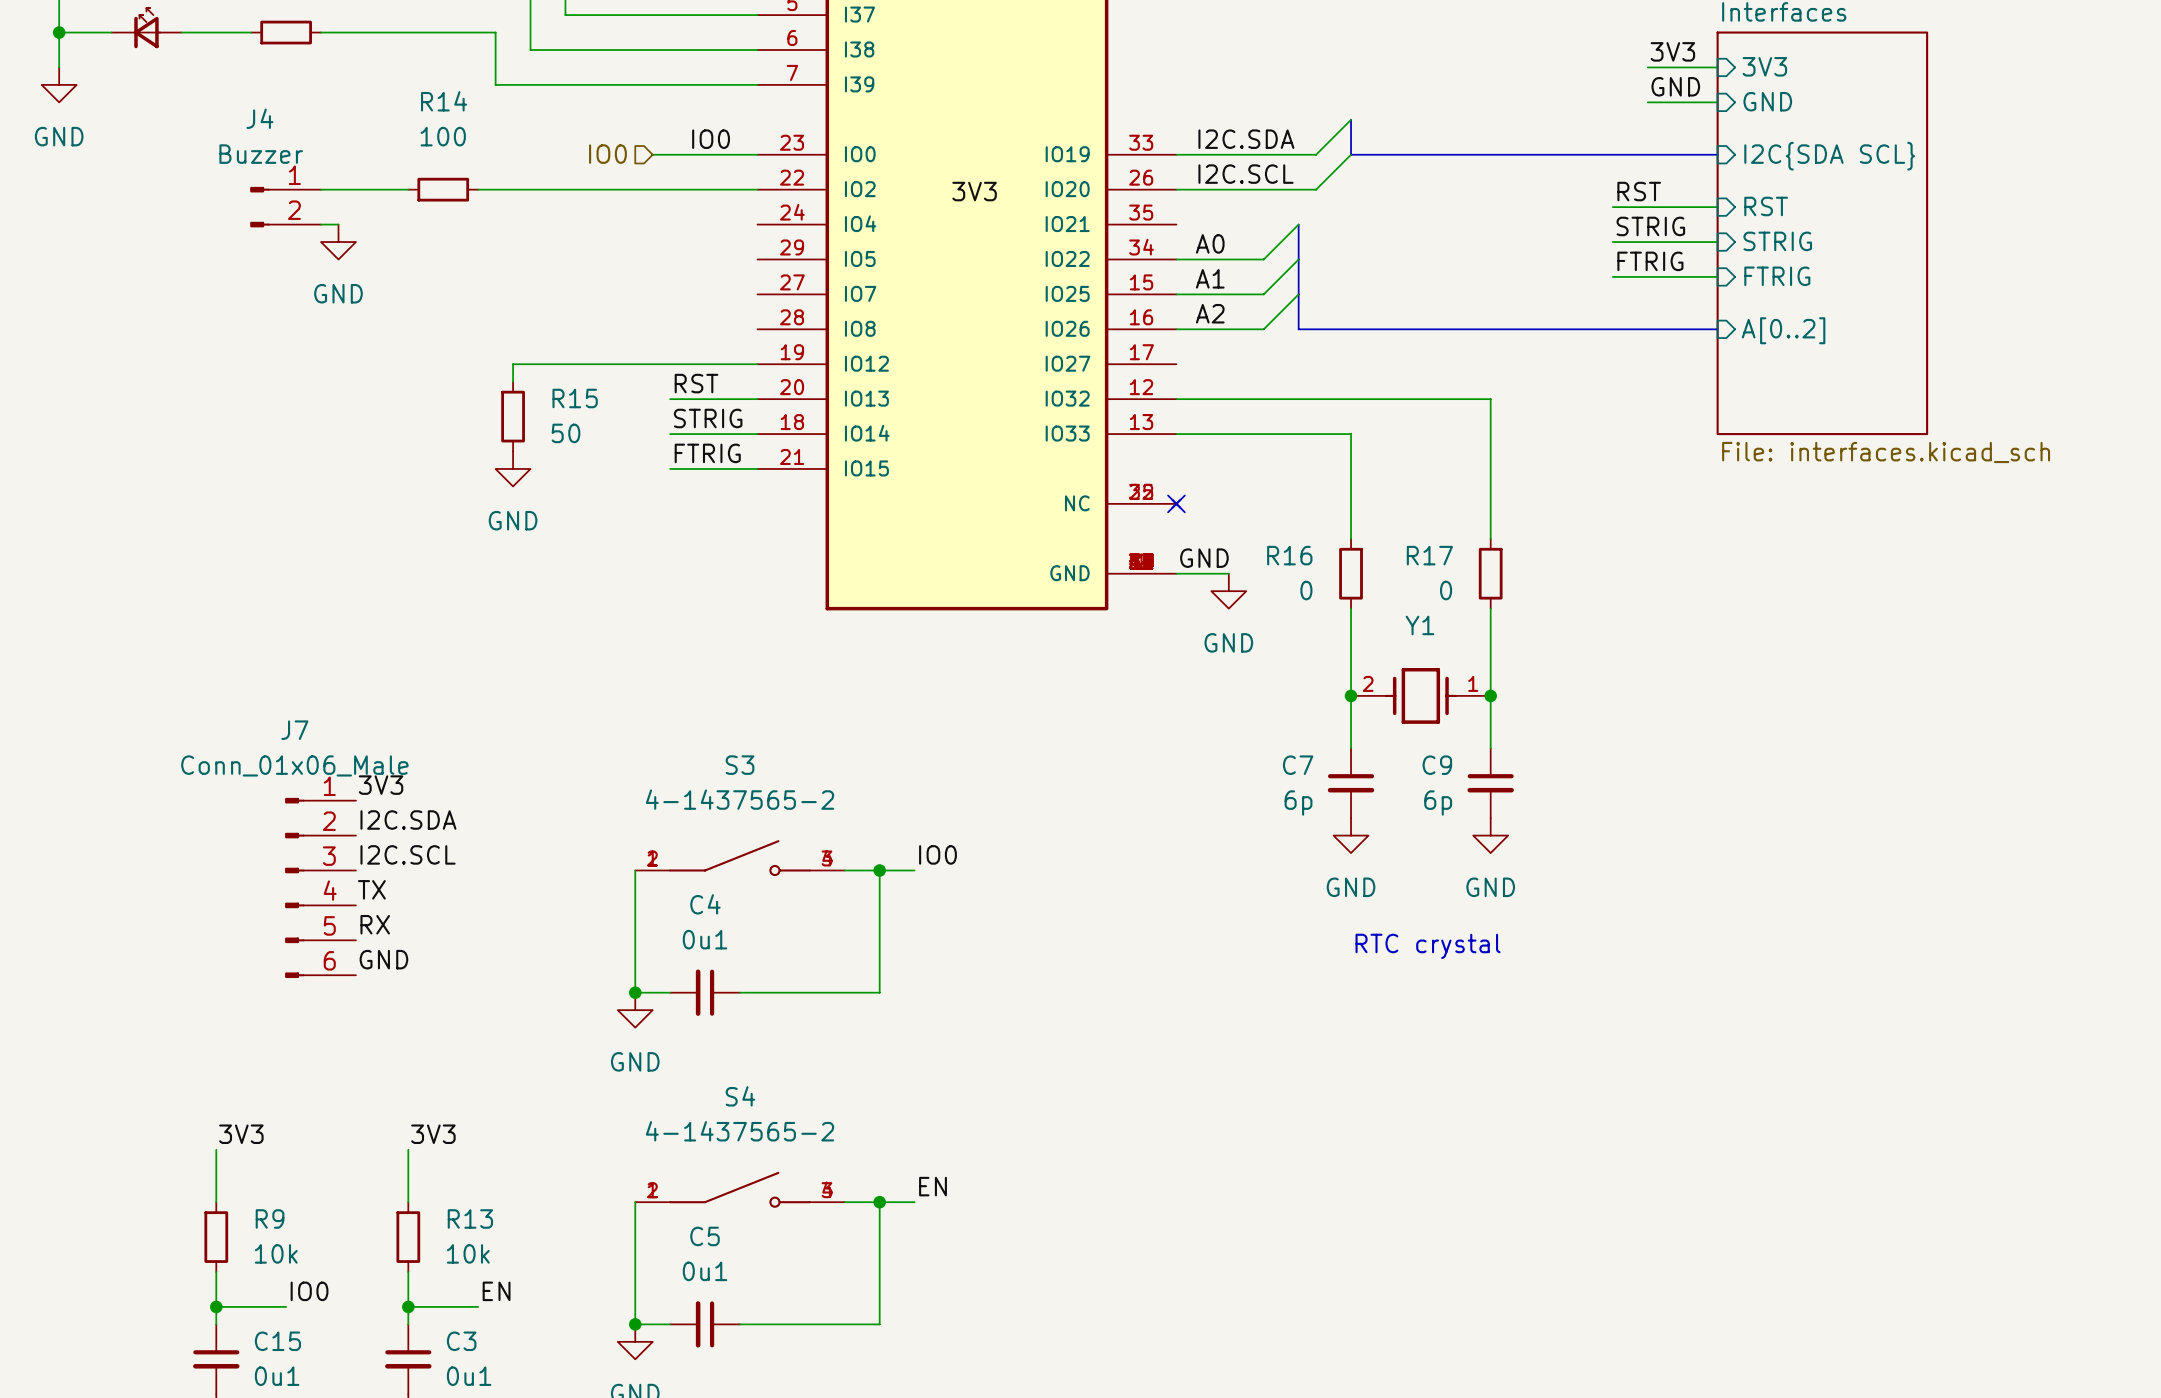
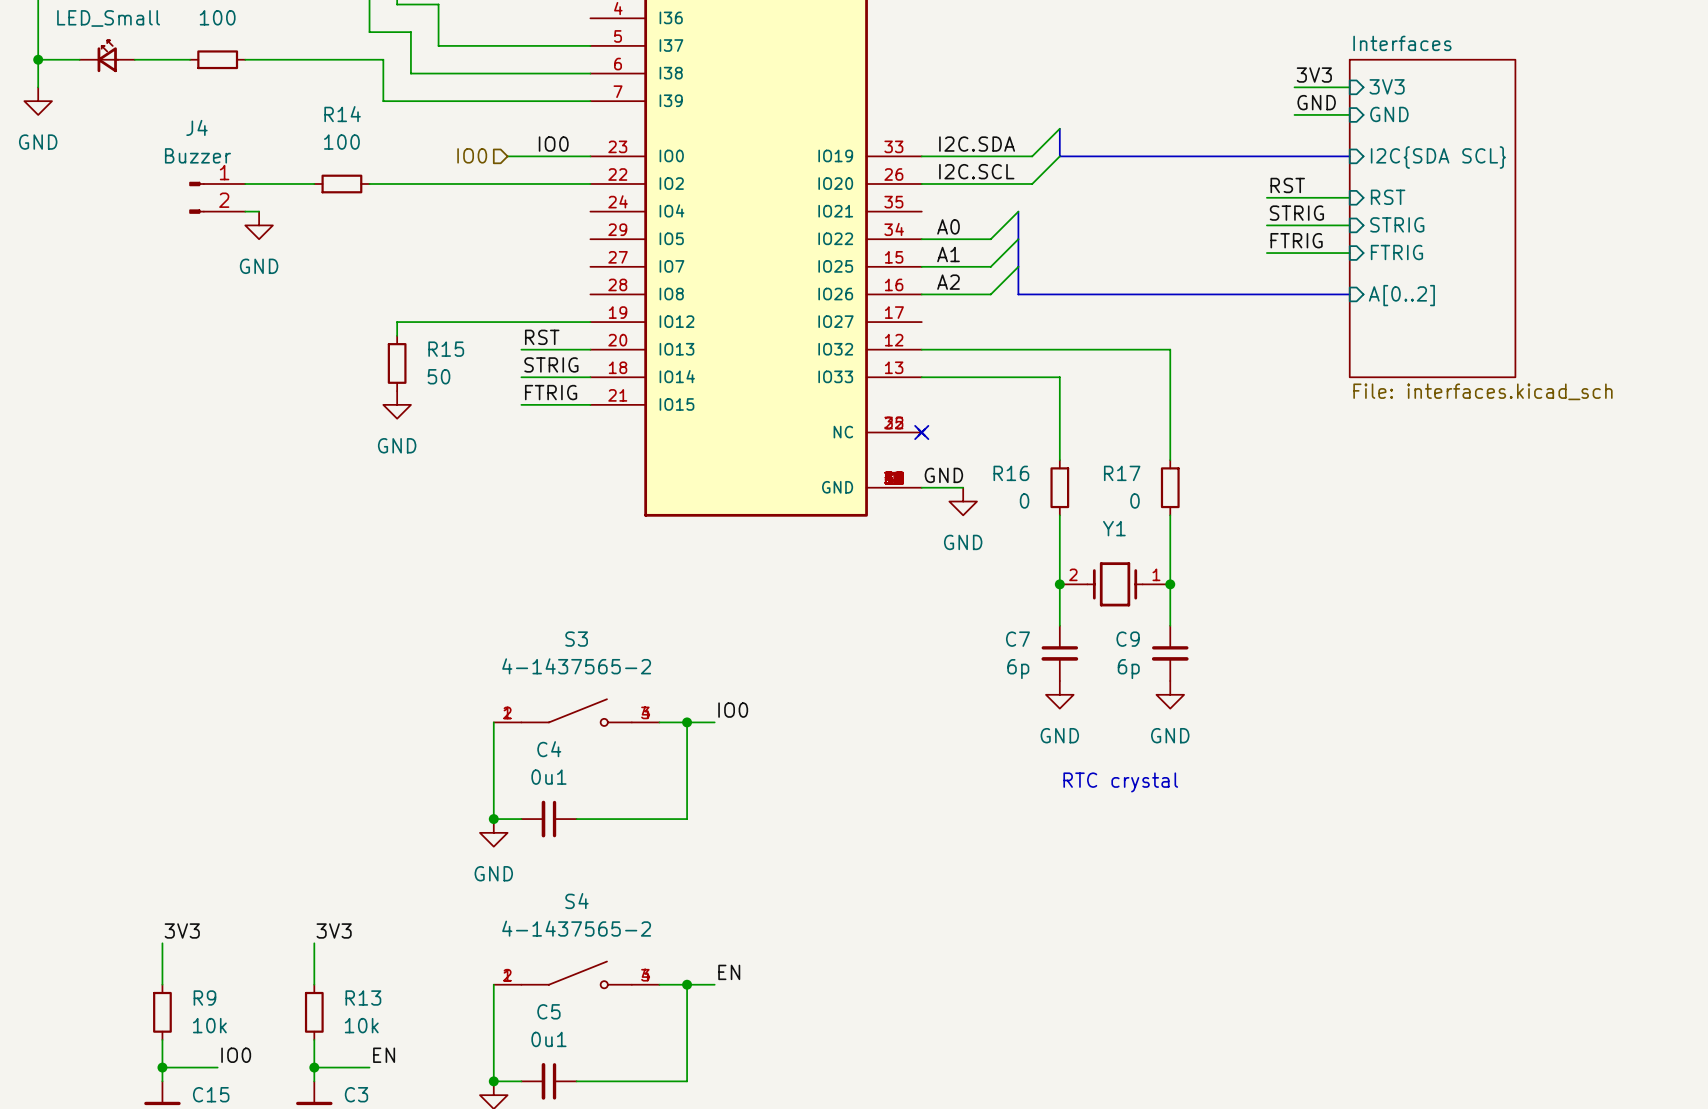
label: 3V3 (974, 191) -> none
label: 3V3 (381, 785) -> none
label: I2C.SDA (408, 820) -> none
label: I2C.SCL (408, 854) -> none
J7: Conn_01x06_Male (320, 887) -> none
label: TX (371, 889) -> none
label: RX (375, 924) -> none
label: GND (383, 959) -> none

